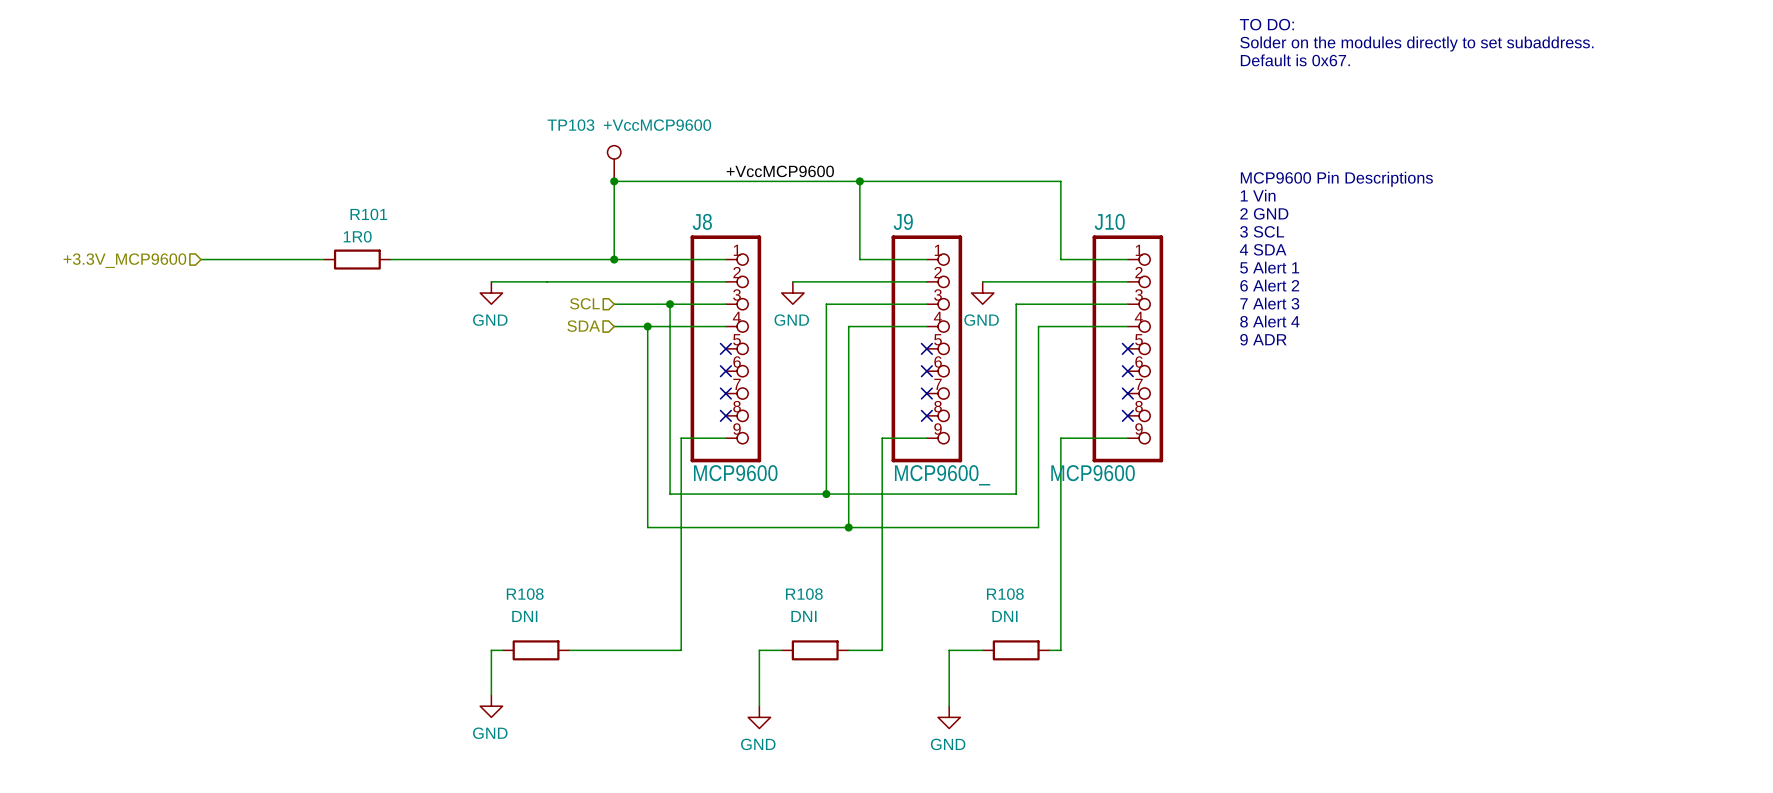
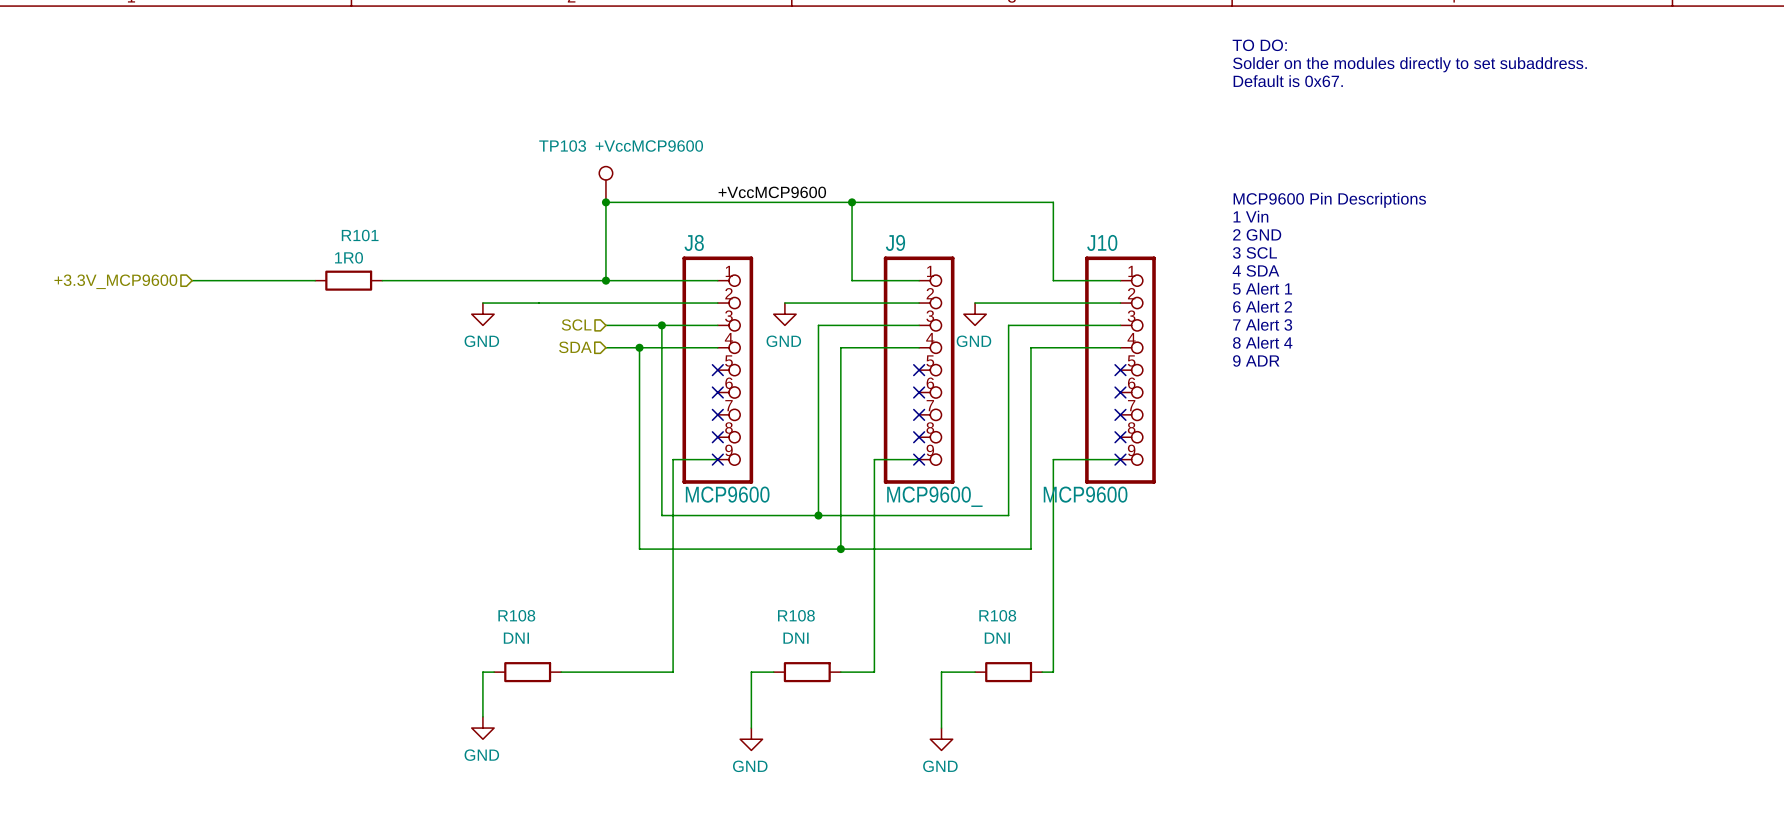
no-connect mark: none -> (717, 459)
no-connect mark: none -> (919, 459)
no-connect mark: none -> (1120, 459)

